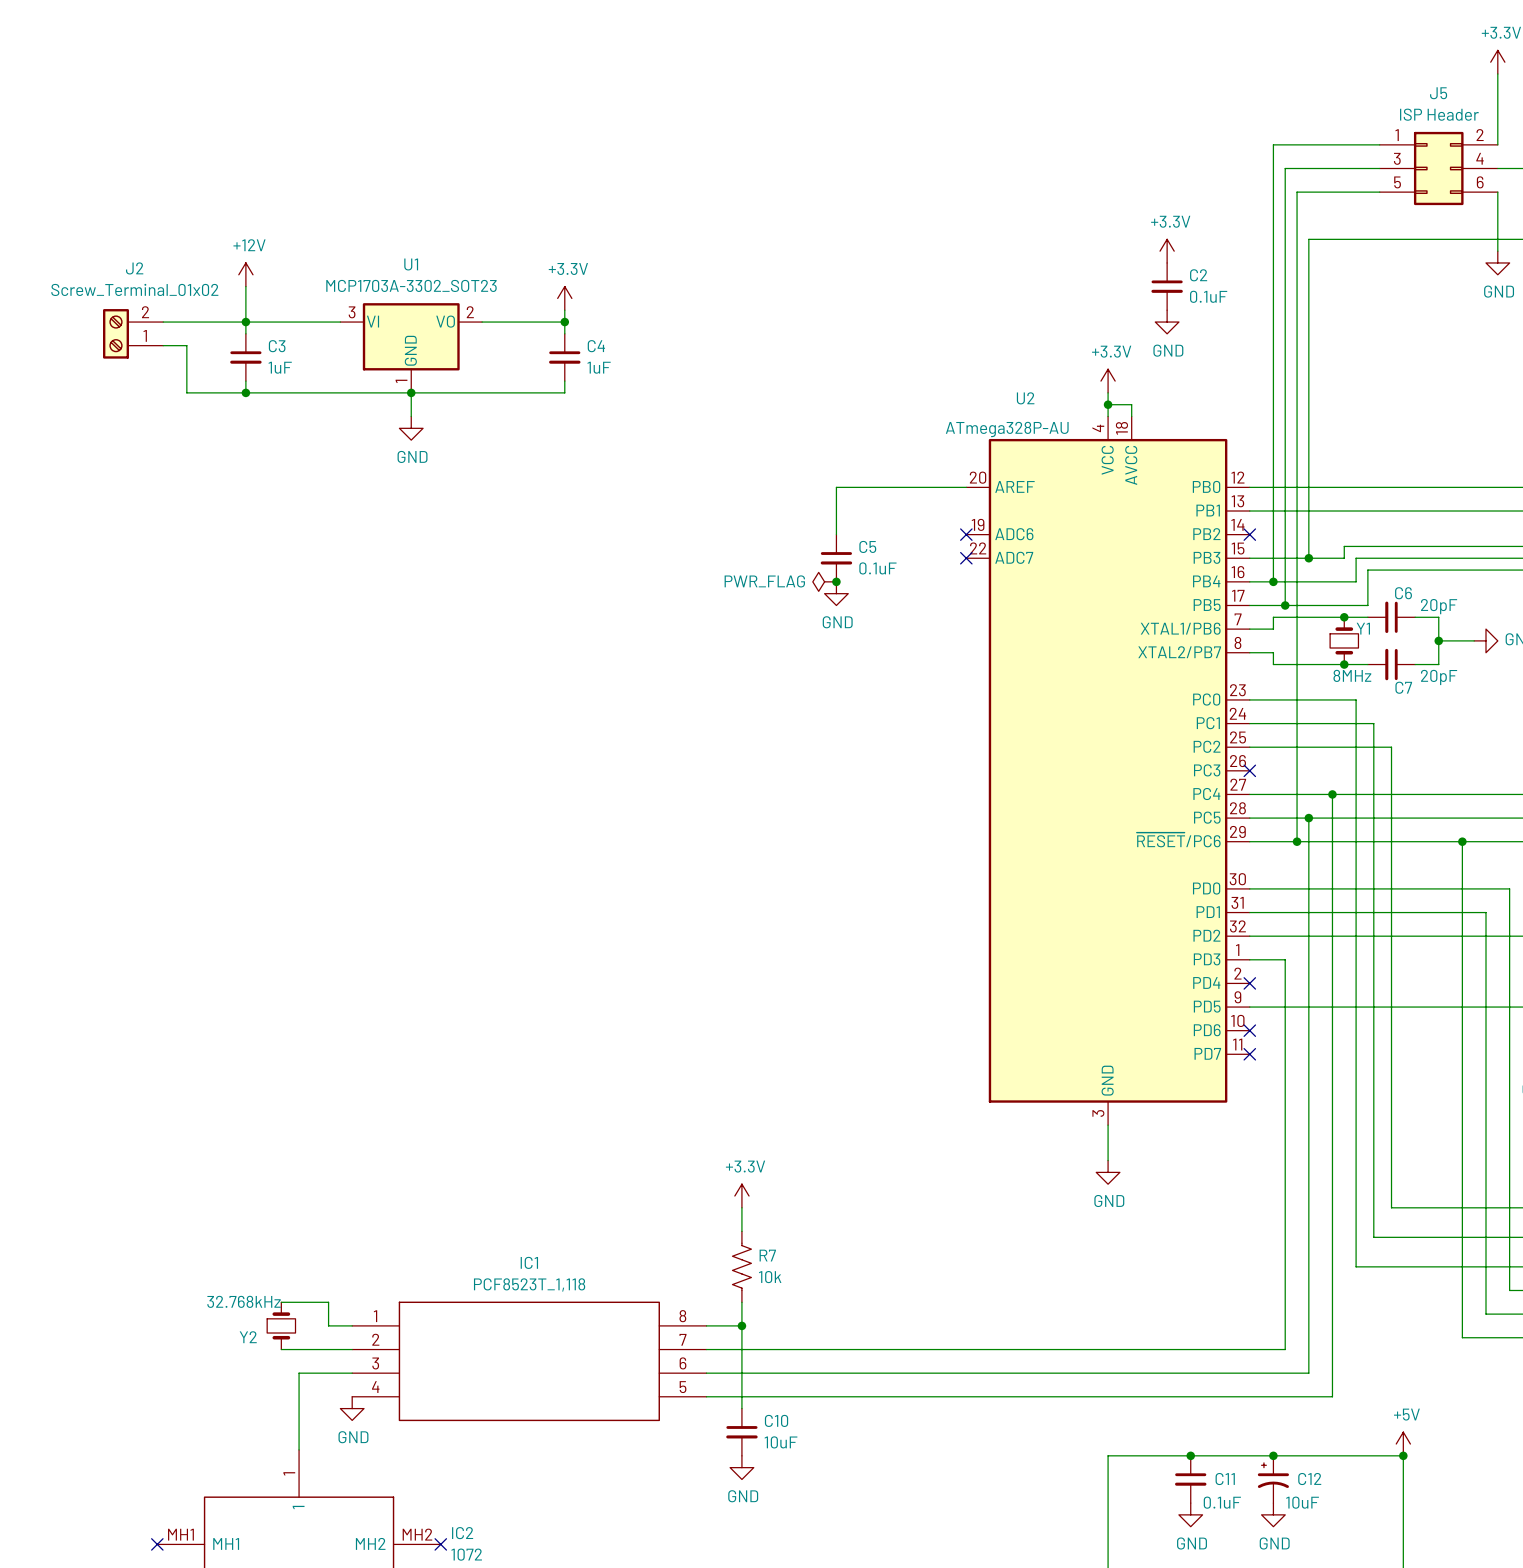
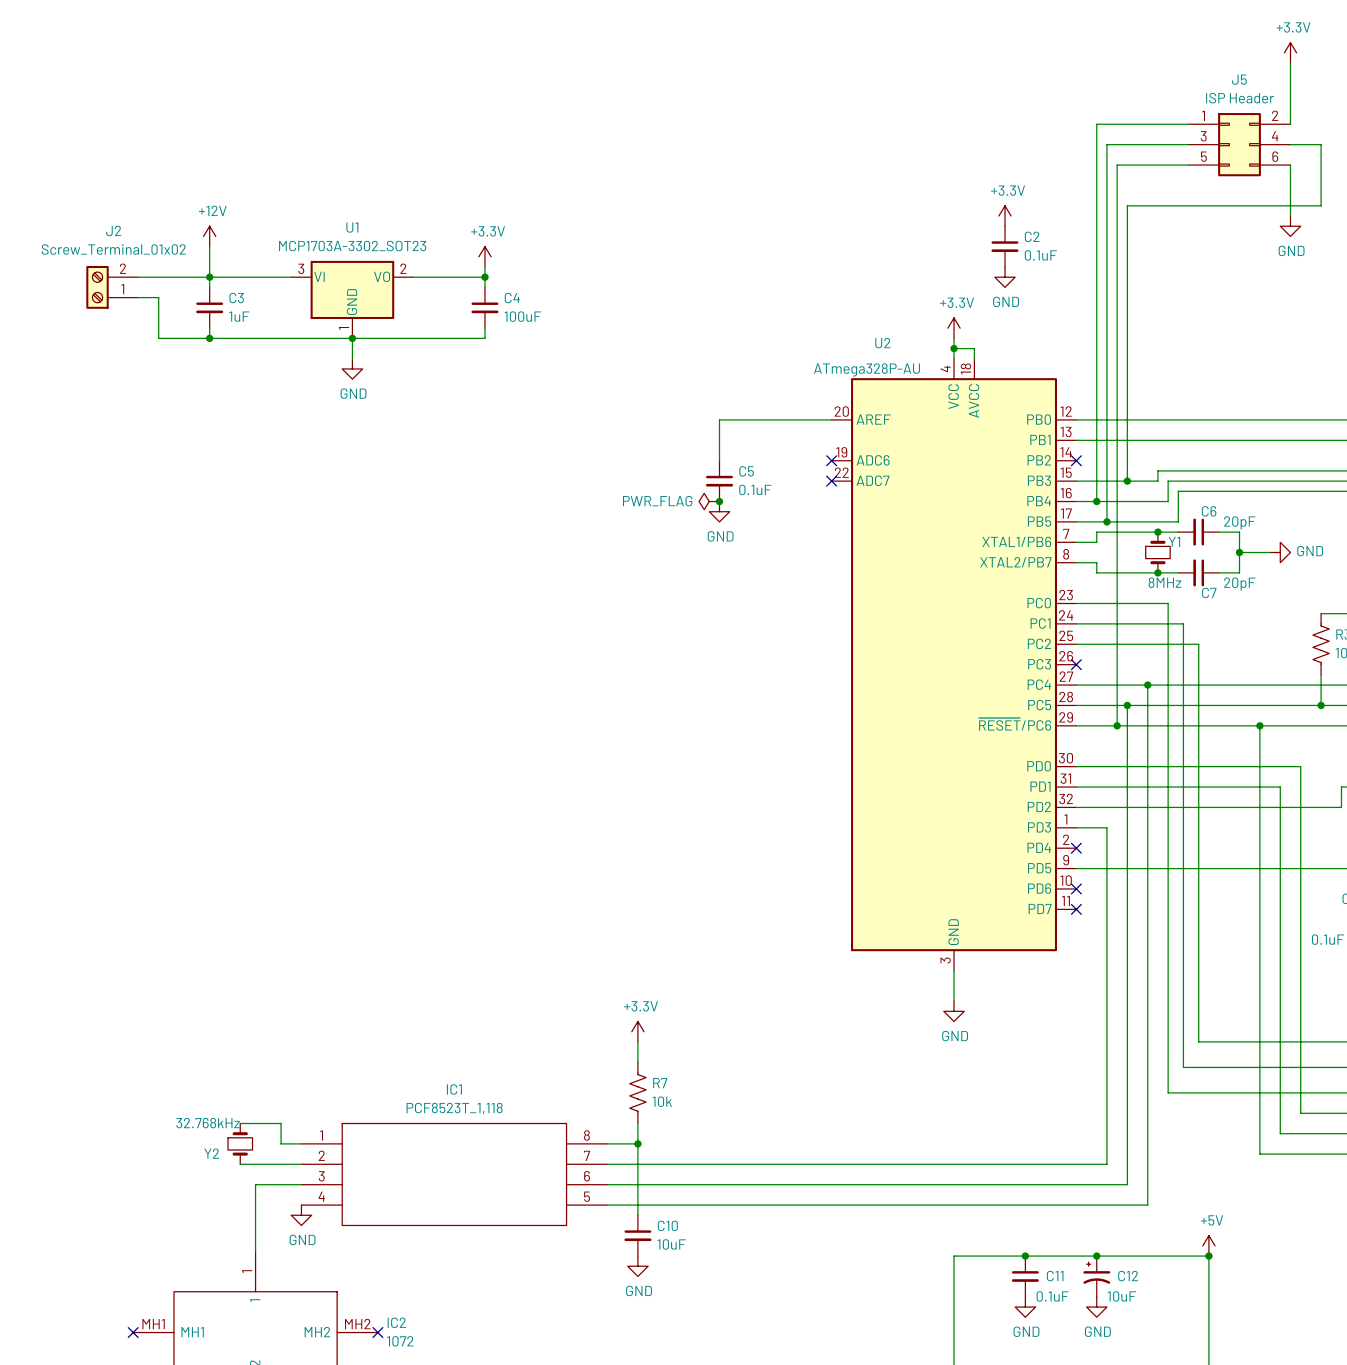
C4 value: 1uF (599, 367) -> 100uF (522, 316)

